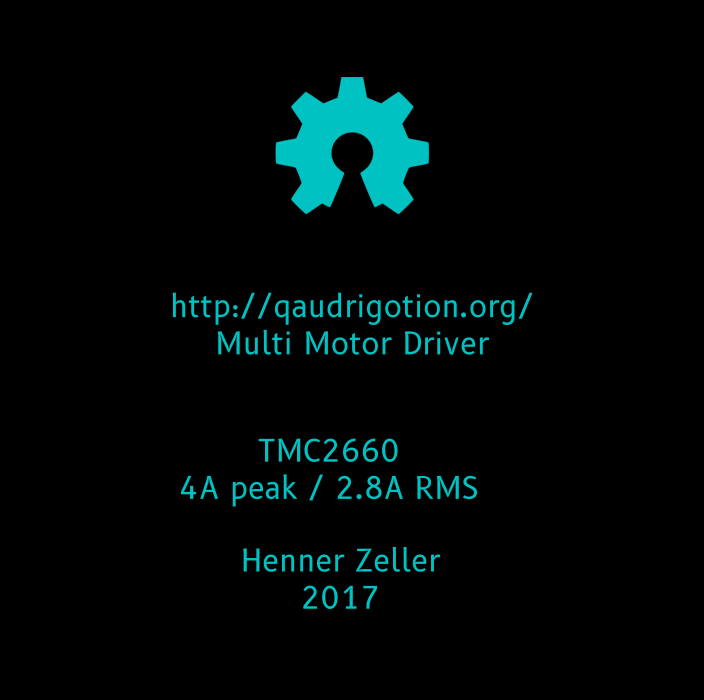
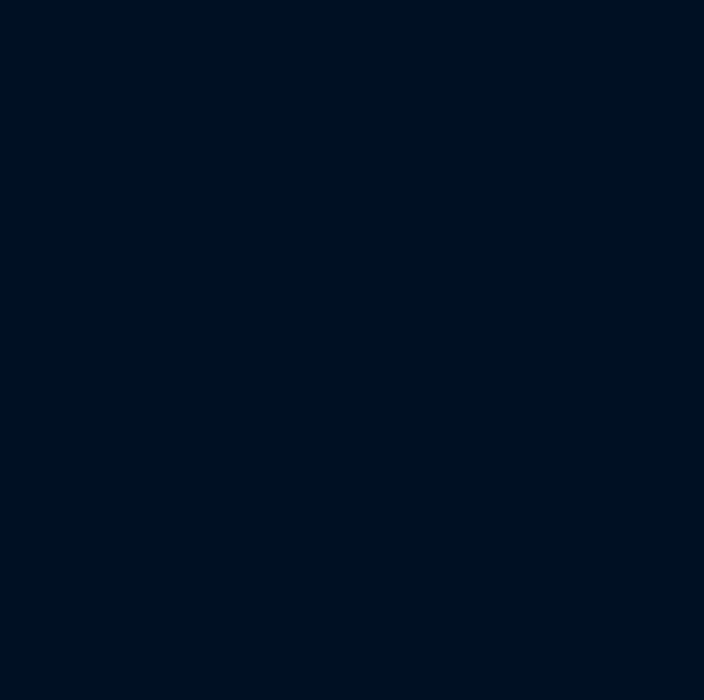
drawing: [275, 76, 429, 215] -> none
text: http://qaudrigotion.org/ (352, 308) -> none
text: Multi Motor Driver (353, 342) -> none
text: TMC2660 (328, 450) -> none
text: 4A peak / 2.8A RMS (329, 490) -> none
text: Henner Zeller (341, 559) -> none
text: 2017 (340, 597) -> none

